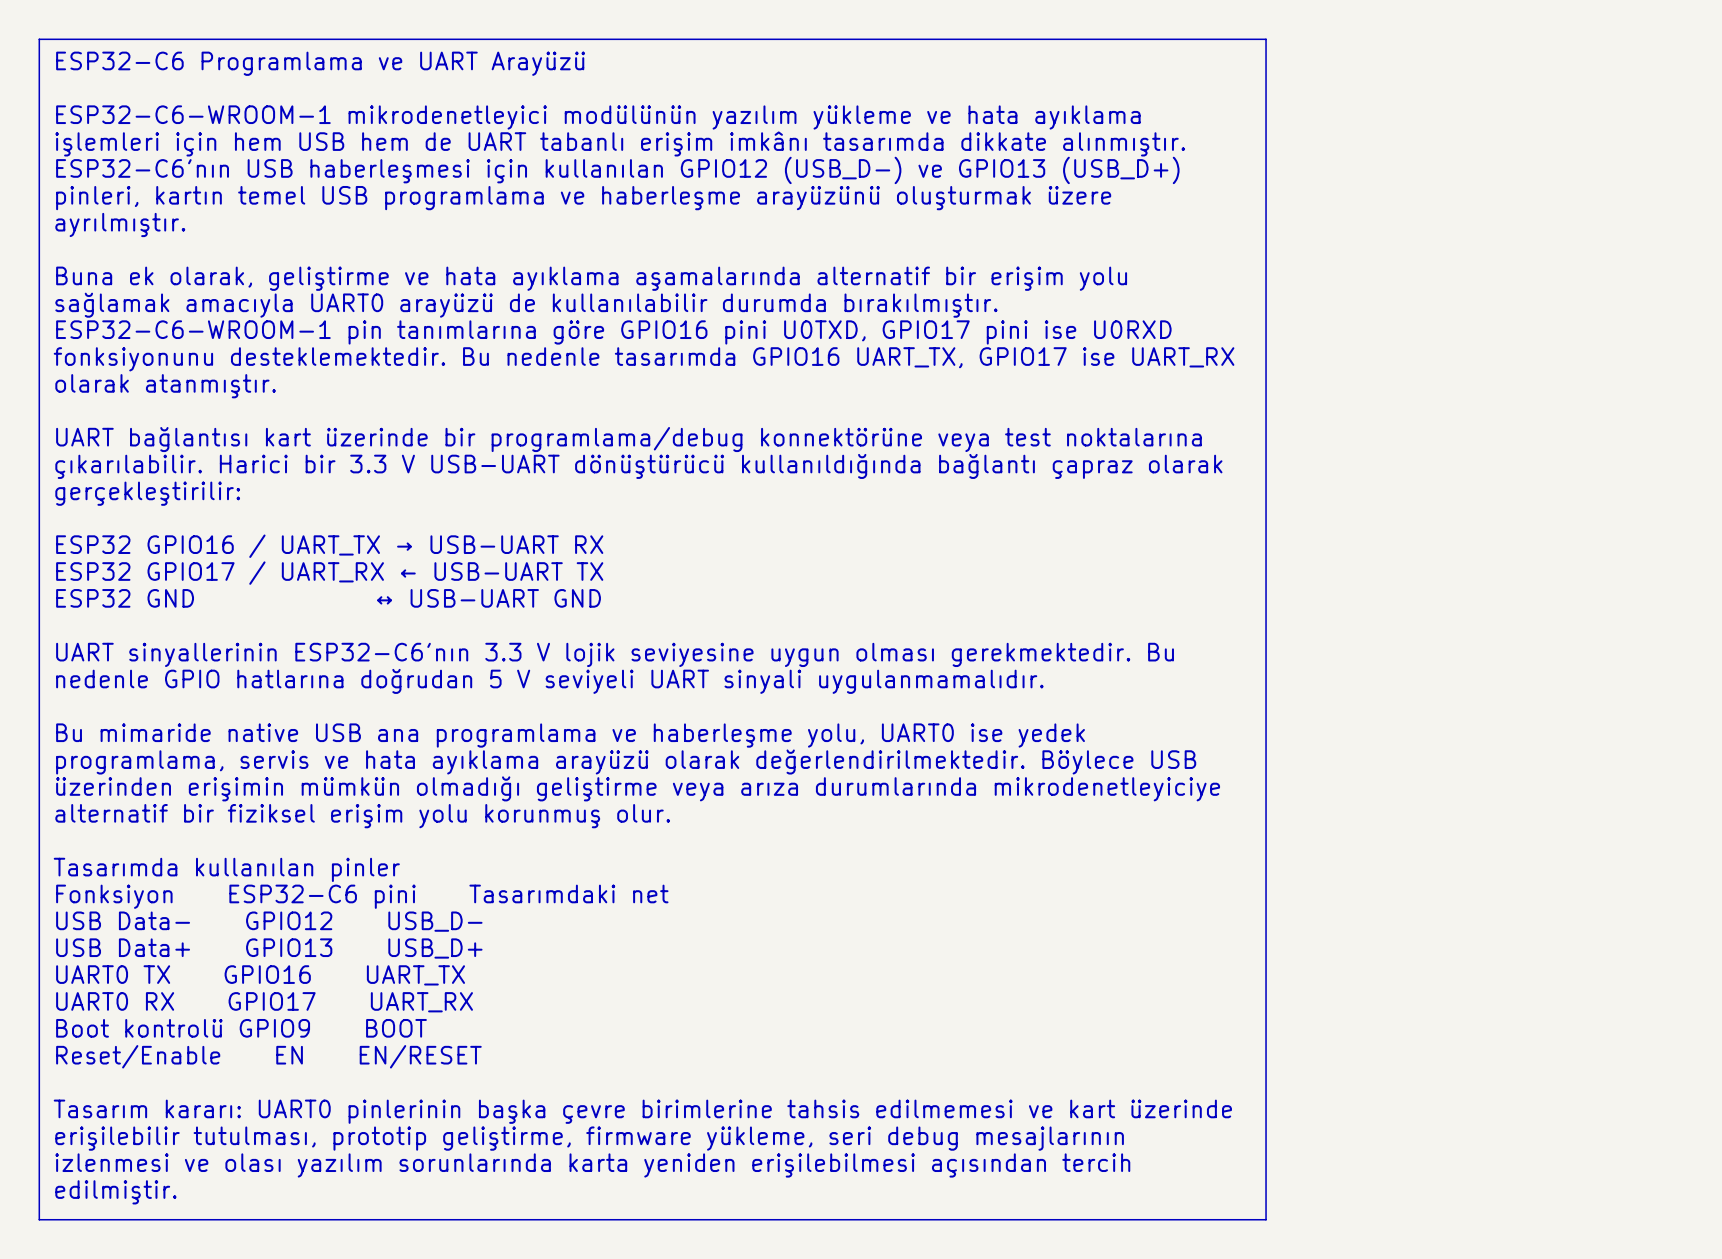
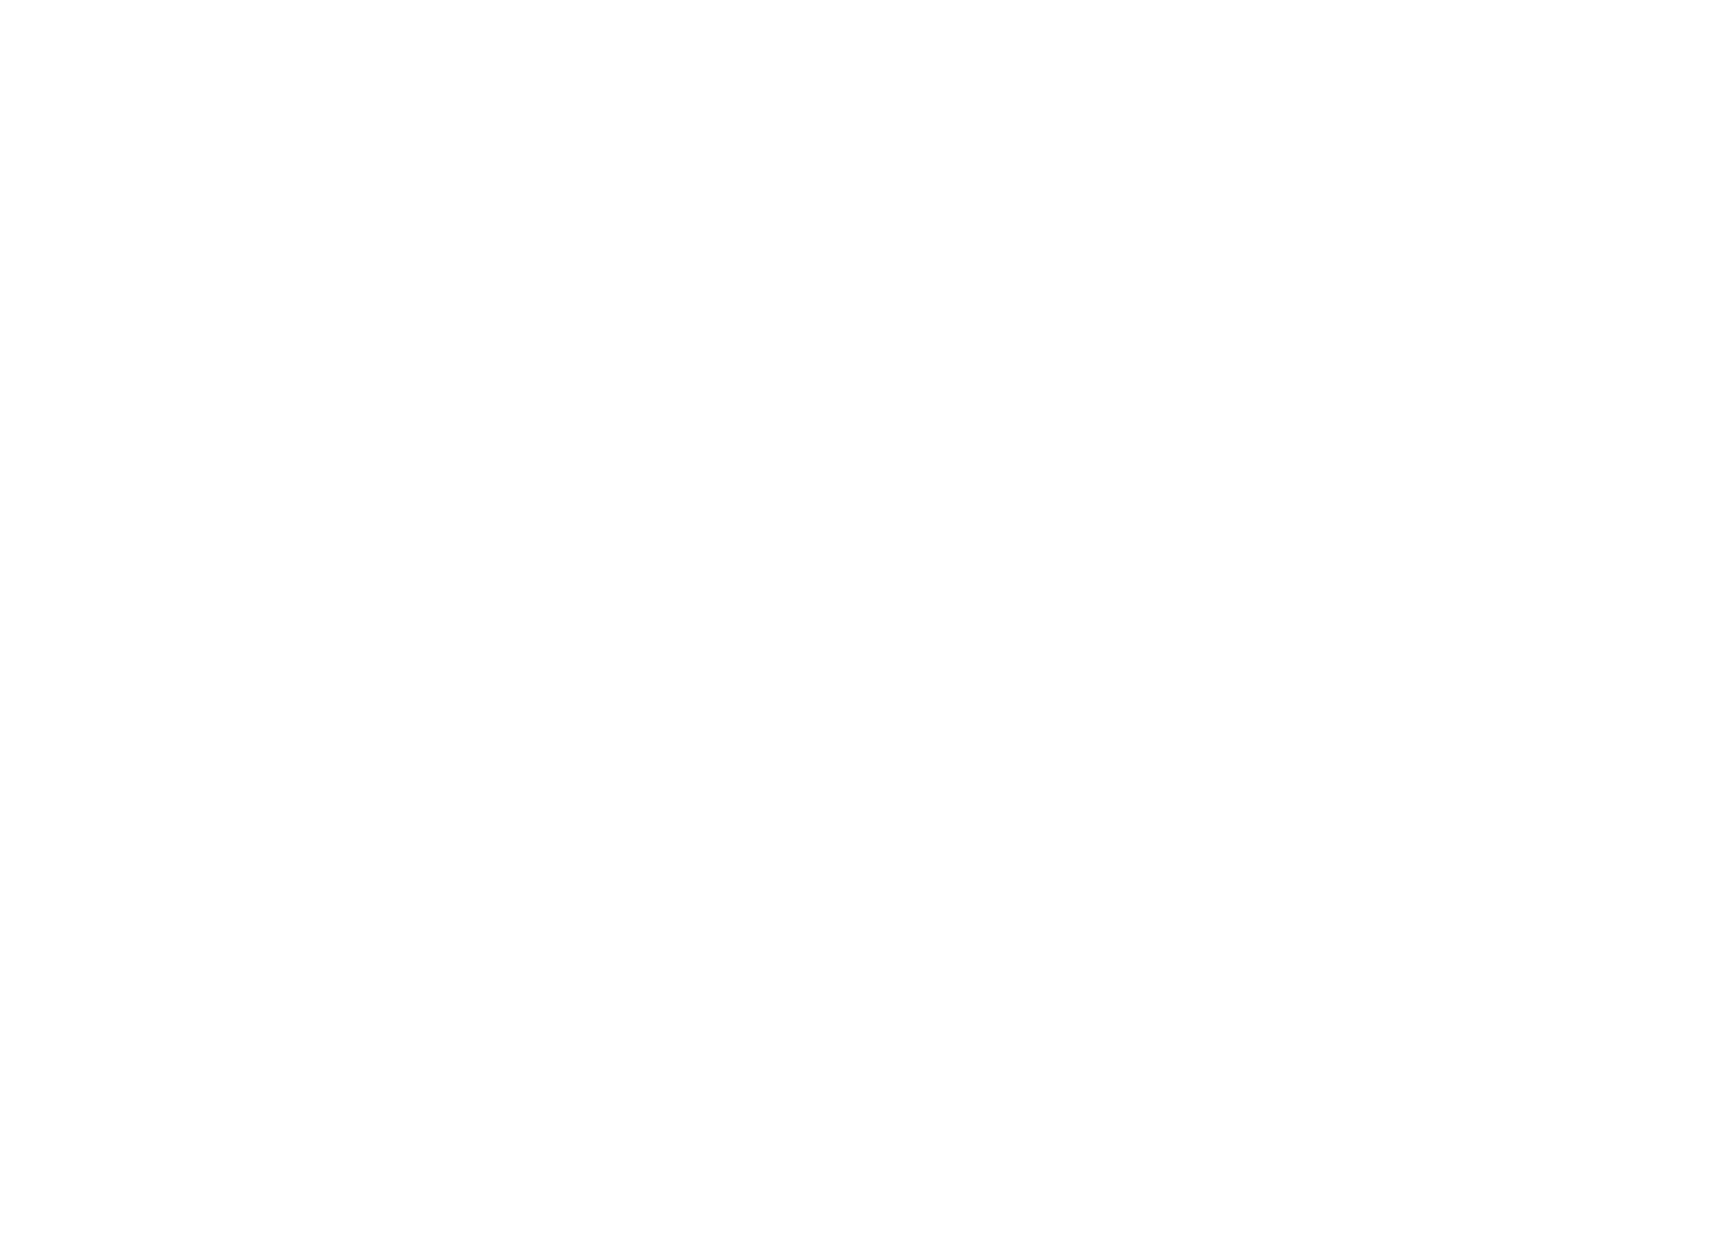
line: (39, 39) (1266, 39) (1266, 1219) (39, 1219) (39, 39) -> none
text: ESP32-C6 Programlama ve UART Arayüzü (320, 63) -> none
text: ESP32-C6-WROOM-1 mikrodenetleyici modülünün yazılım yükleme ve hata ayıklama (598, 117) -> none
text: işlemleri için hem USB hem de UART tabanlı erişim imkânı tasarımda dikkate alınmıştır. (620, 143) -> none
text: ESP32-C6'nın USB haberleşmesi için kullanılan GPIO12 (USB_D−) ve GPIO13 (USB_D+) (617, 170) -> none
text: pinleri, kartın temel USB programlama ve haberleşme arayüzünü oluşturmak üzere (583, 198) -> none
text: ayrılmıştır. (120, 224) -> none
text: Buna ek olarak, geliştirme ve hata ayıklama aşamalarında alternatif bir erişim yolu (591, 278) -> none
text: sağlamak amacıyla UART0 arayüzü de kullanılabilir durumda bırakılmıştır. (526, 305) -> none
text: ESP32-C6-WROOM-1 pin tanımlarına göre GPIO16 pini U0TXD, GPIO17 pini ise U0RXD (613, 332) -> none
text: fonksiyonunu desteklemektedir. Bu nedenle tasarımda GPIO16 UART_TX, GPIO17 ise UART_RX (644, 359) -> none
text: olarak atanmıştır. (165, 386) -> none
text: UART bağlantısı kart üzerinde bir programlama/debug konnektörüne veya test noktalarına (628, 439) -> none
text: çıkarılabilir. Harici bir 3.3 V USB-UART dönüştürücü kullanıldığında bağlantı çapraz olarak (638, 466) -> none
text: gerçekleştirilir: (147, 493) -> none
text: ESP32 GPIO16 / UART_TX → USB-UART RX (329, 546) -> none
text: ESP32 GPIO17 / UART_RX ← USB-UART TX (329, 573) -> none
text: ESP32 GND ↔ USB-UART GND (328, 598) -> none
text: UART sinyallerinin ESP32-C6'nın 3.3 V lojik seviyesine uygun olması gerekmektedir. Bu (615, 654) -> none
text: nedenle GPIO hatlarına doğrudan 5 V seviyeli UART sinyali uygulanmamalıdır. (549, 681) -> none
text: Bu mimaride native USB ana programlama ve haberleşme yolu, UART0 ise yedek (570, 735) -> none
text: programlama, servis ve hata ayıklama arayüzü olarak değerlendirilmektedir. Böylece USB (626, 761) -> none
text: üzerinden erişimin mümkün olmadığı geliştirme veya arıza durumlarında mikrodenetleyiciye (638, 788) -> none
text: alternatif bir fiziksel erişim yolu korunmuş olur. (362, 816) -> none
text: Tasarımda kullanılan pinler (226, 869) -> none
text: Fonksiyon ESP32-C6 pini Tasarımdaki net (362, 896) -> none
text: USB Data− GPIO12 USB_D- (269, 921) -> none
text: USB Data+ GPIO13 USB_D+ (269, 948) -> none
text: UART0 TX GPIO16 UART_TX (260, 975) -> none
text: UART0 RX GPIO17 UART_RX (264, 1002) -> none
text: Boot kontrolü GPIO9 BOOT (241, 1028) -> none
text: Reset/Enable EN EN/RESET (268, 1056) -> none
text: Tasarım kararı: UART0 pinlerinin başka çevre birimlerine tahsis edilmemesi ve kart üzerinde (642, 1111) -> none
text: erişilebilir tutulması, prototip geliştirme, firmware yükleme, seri debug mesajlarının (589, 1138) -> none
text: izlenmesi ve olası yazılım sorunlarında karta yeniden erişilebilmesi açısından tercih (592, 1165) -> none
text: edilmiştir. (115, 1192) -> none

